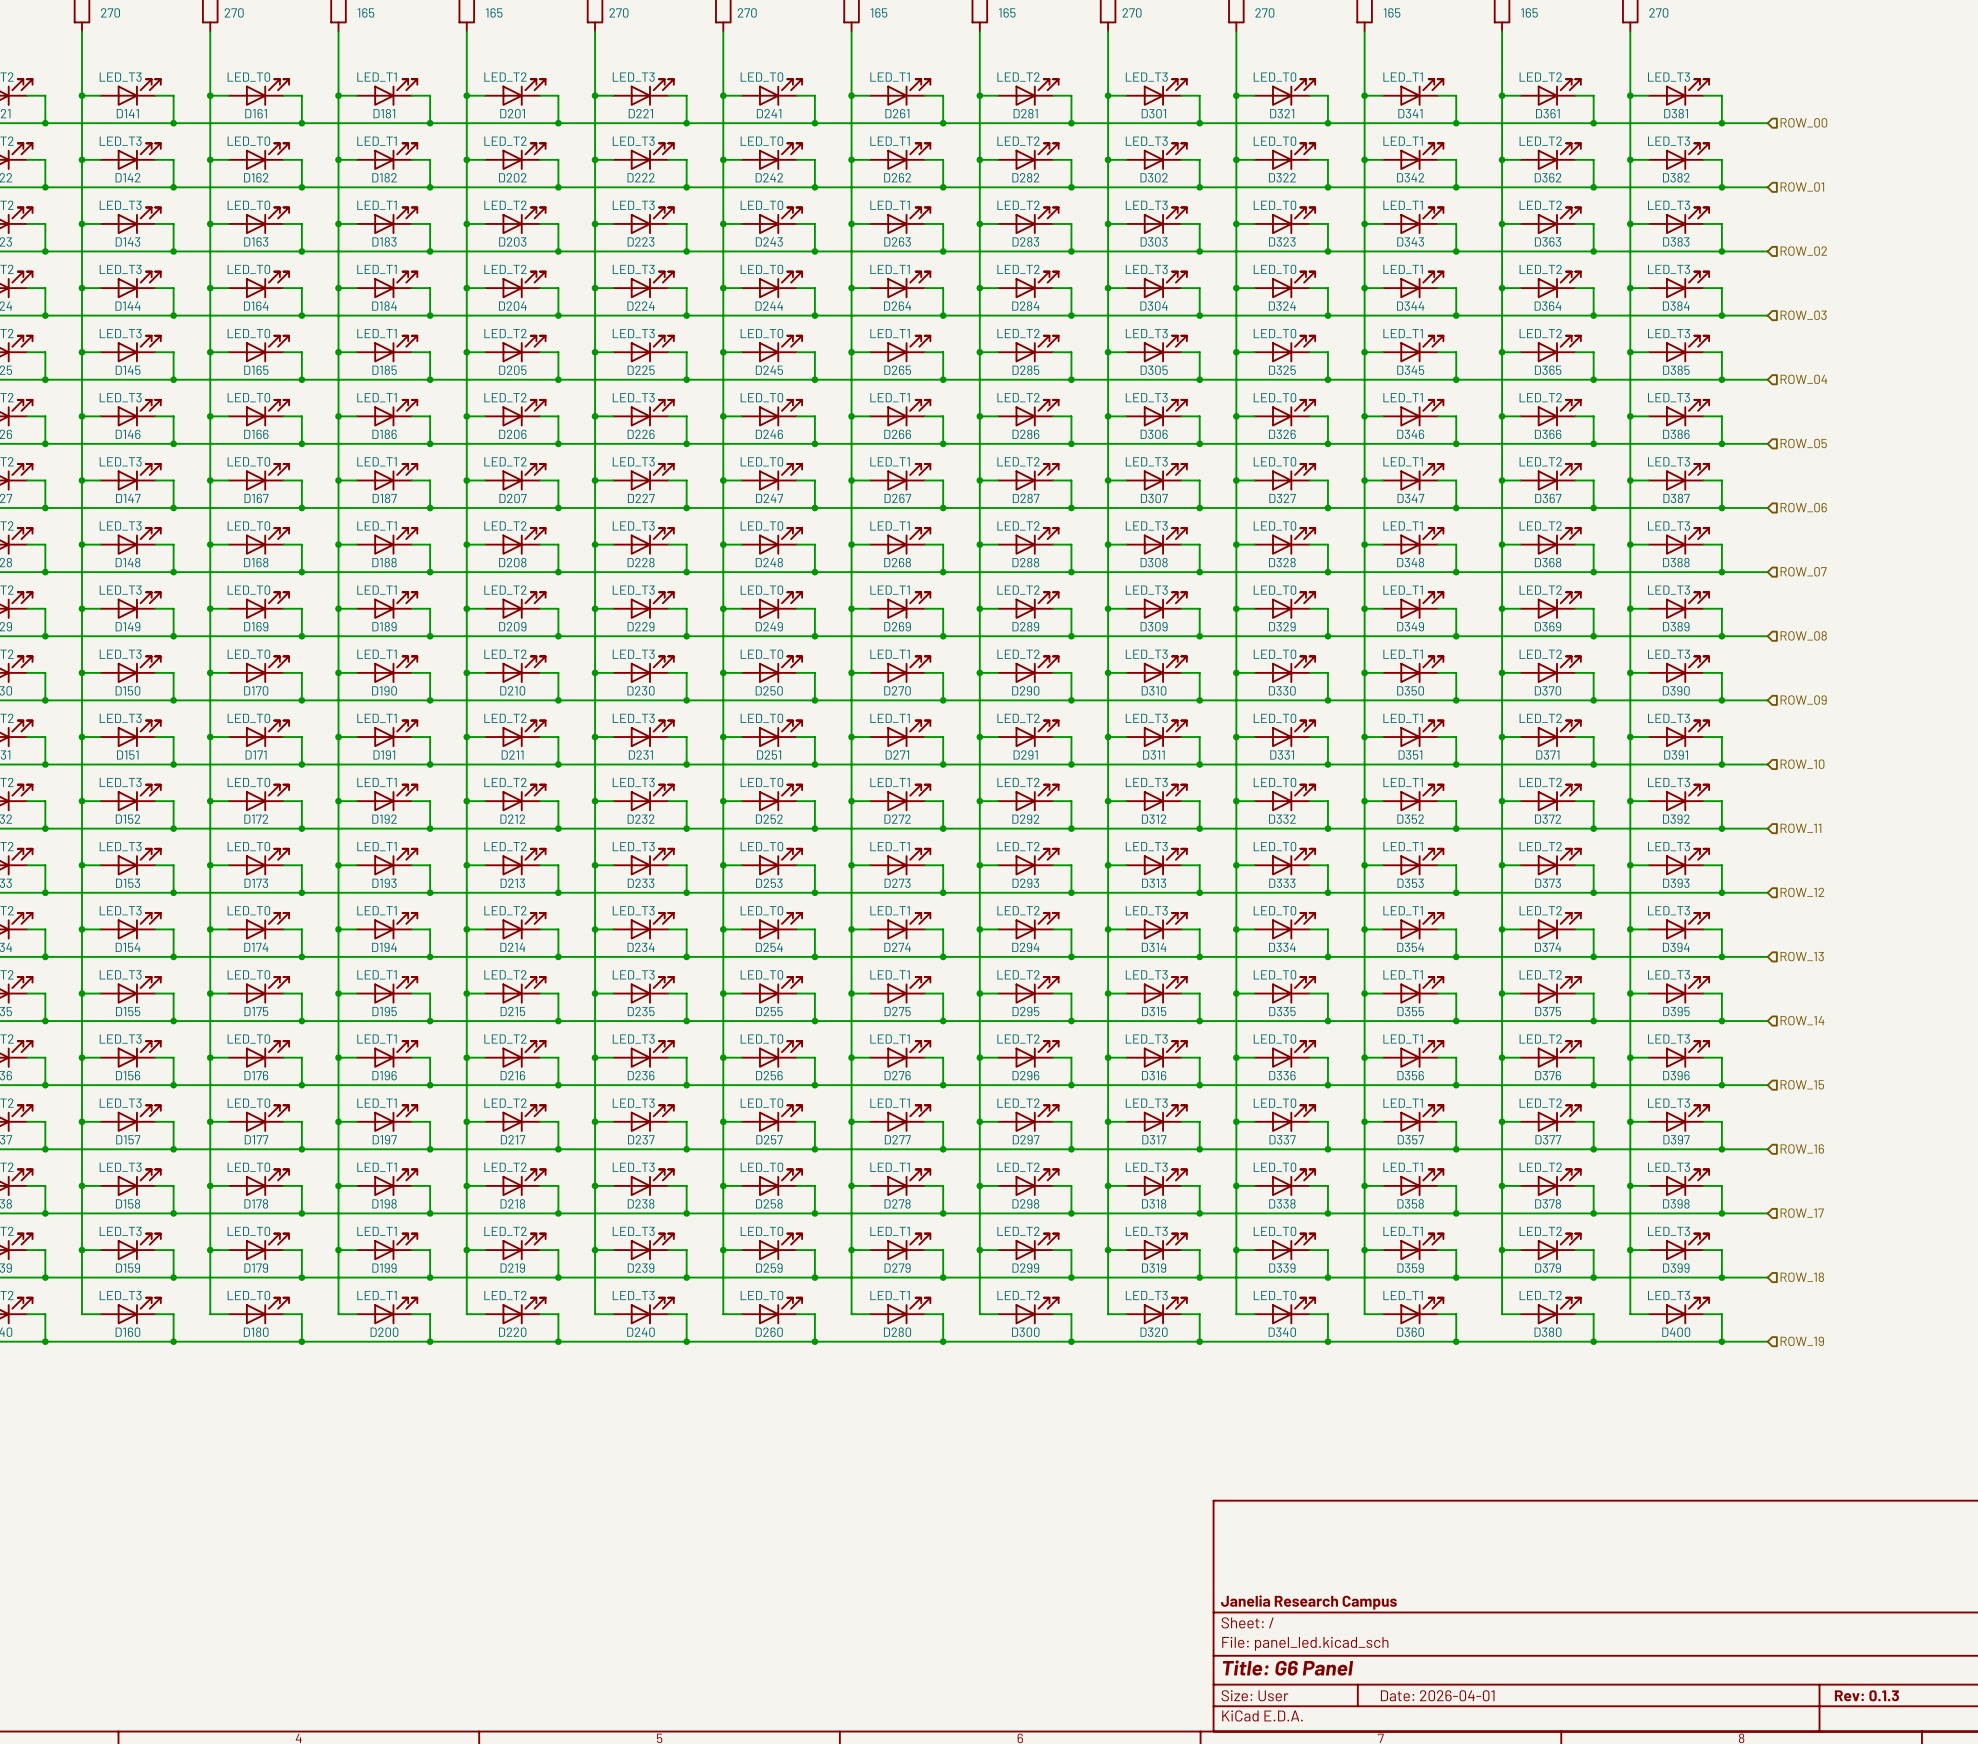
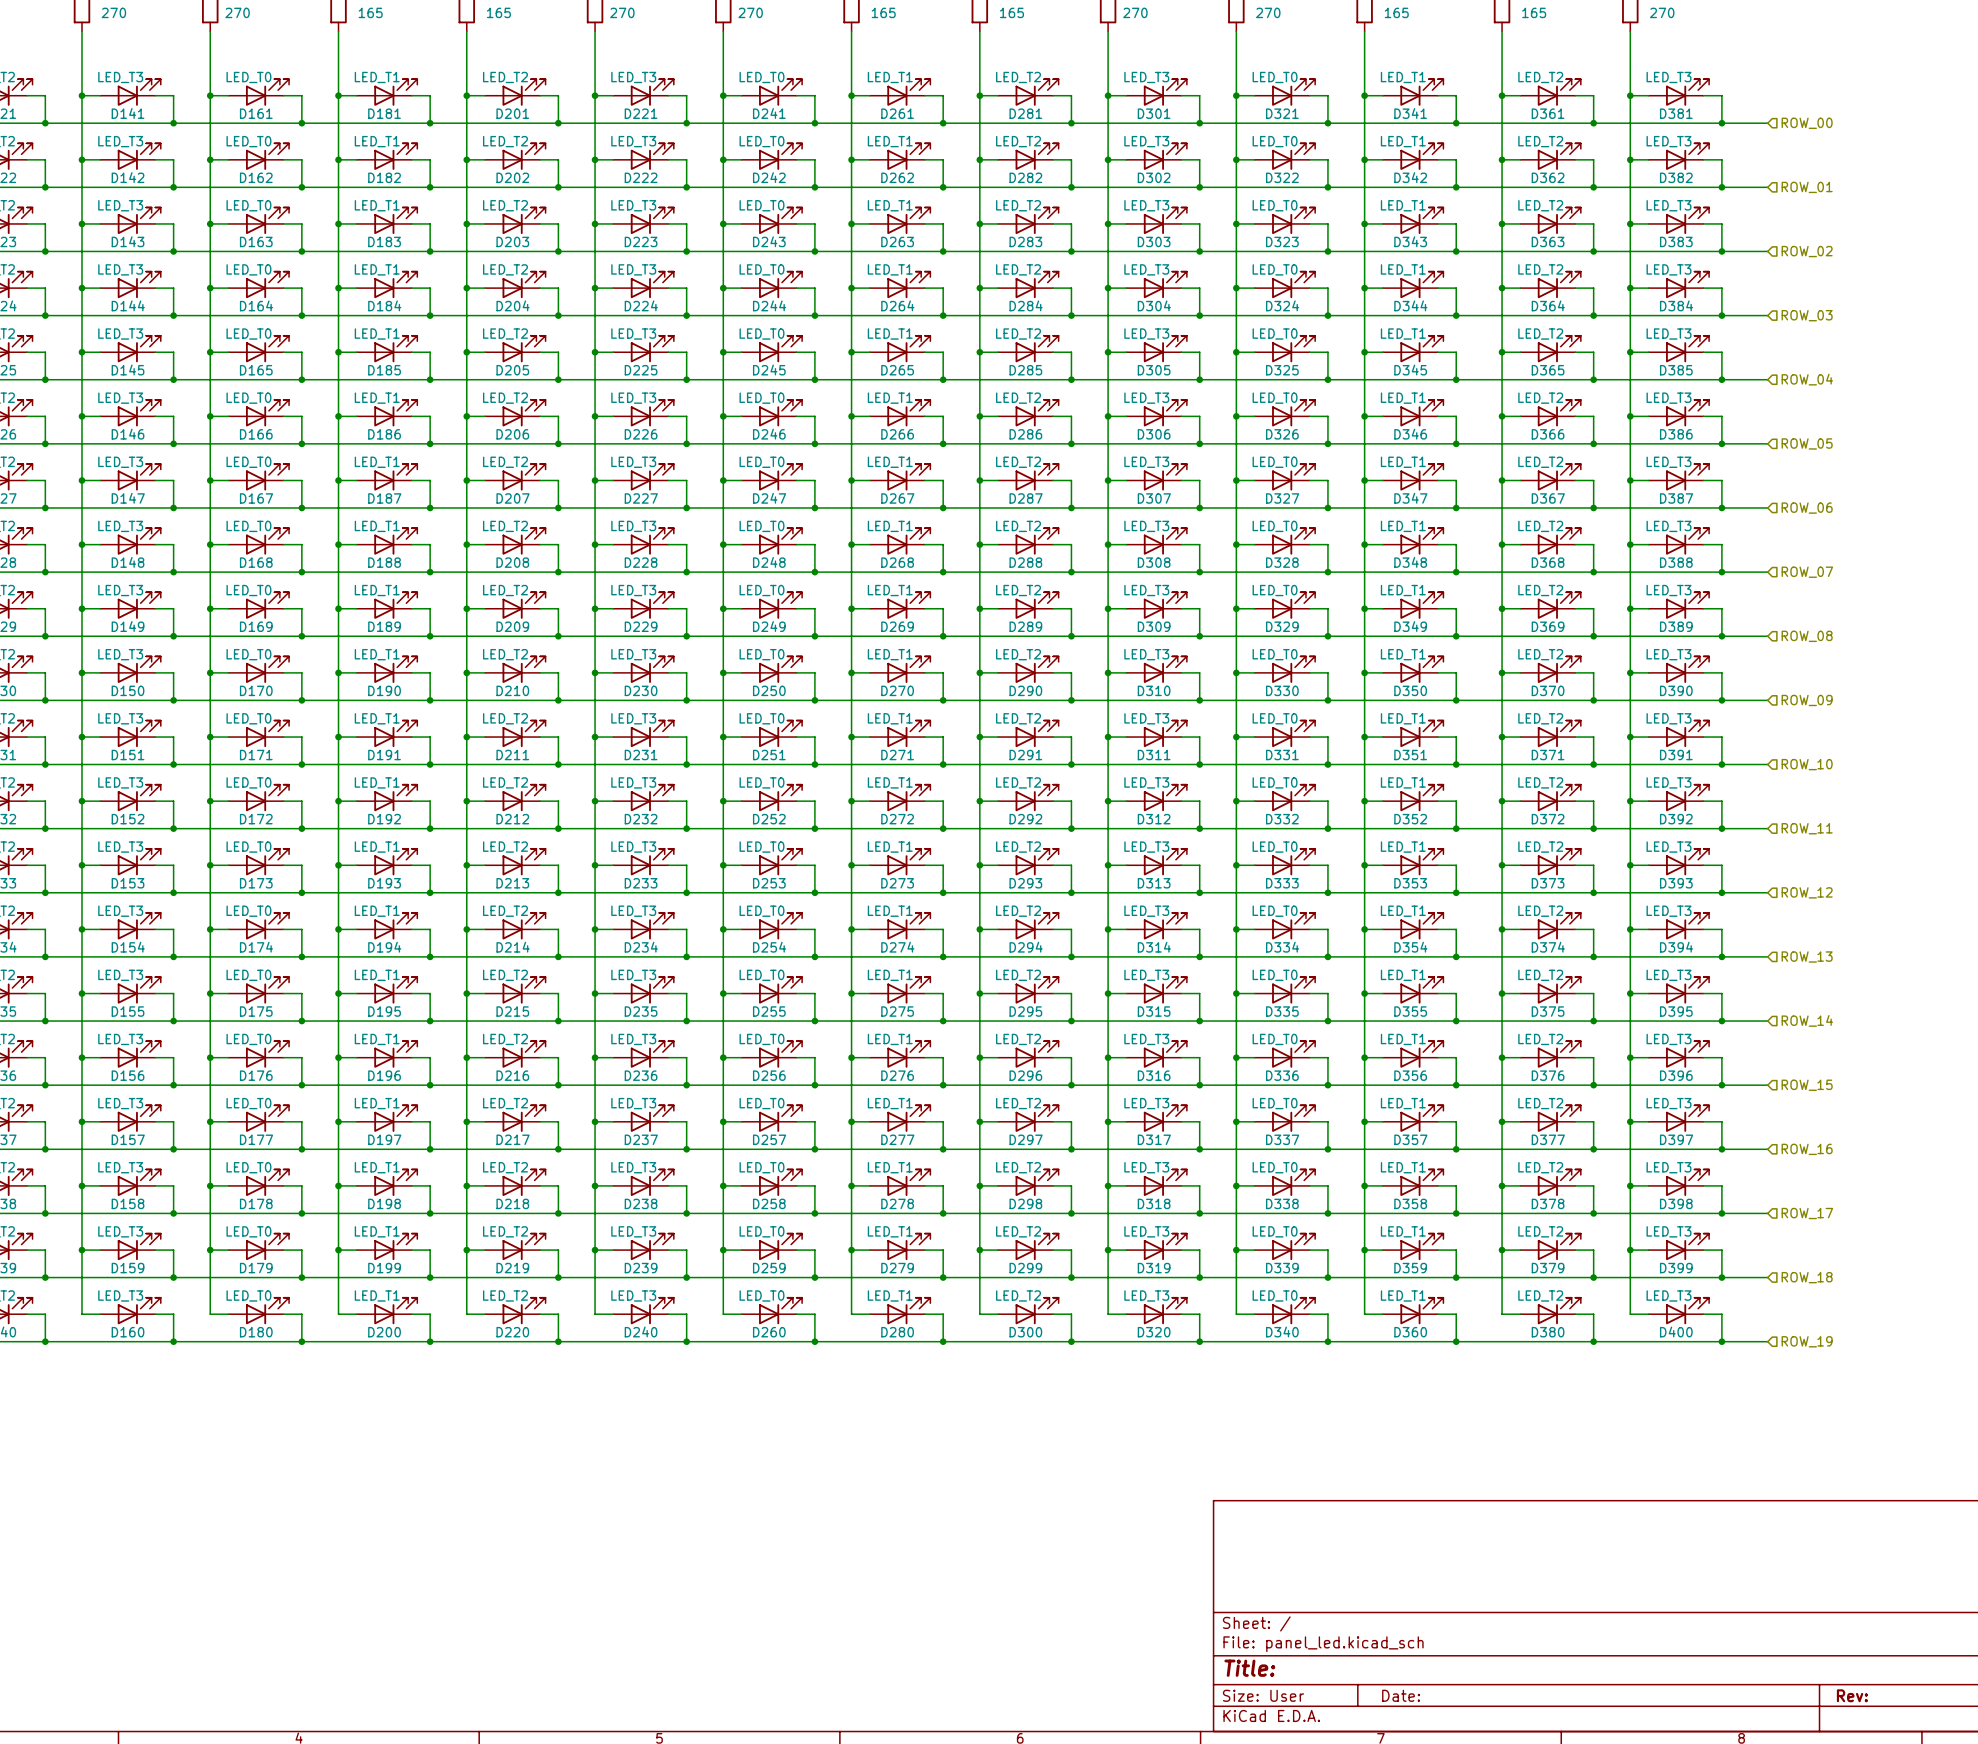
title block: Janelia Research Campus (1308, 1602) -> none
title block: Title: G6 Panel (1287, 1668) -> Title: (1249, 1668)
title block: Date: 2026-04-01 (1437, 1695) -> Date: (1401, 1695)
title block: Rev: 0.1.3 (1866, 1695) -> Rev: (1852, 1695)

